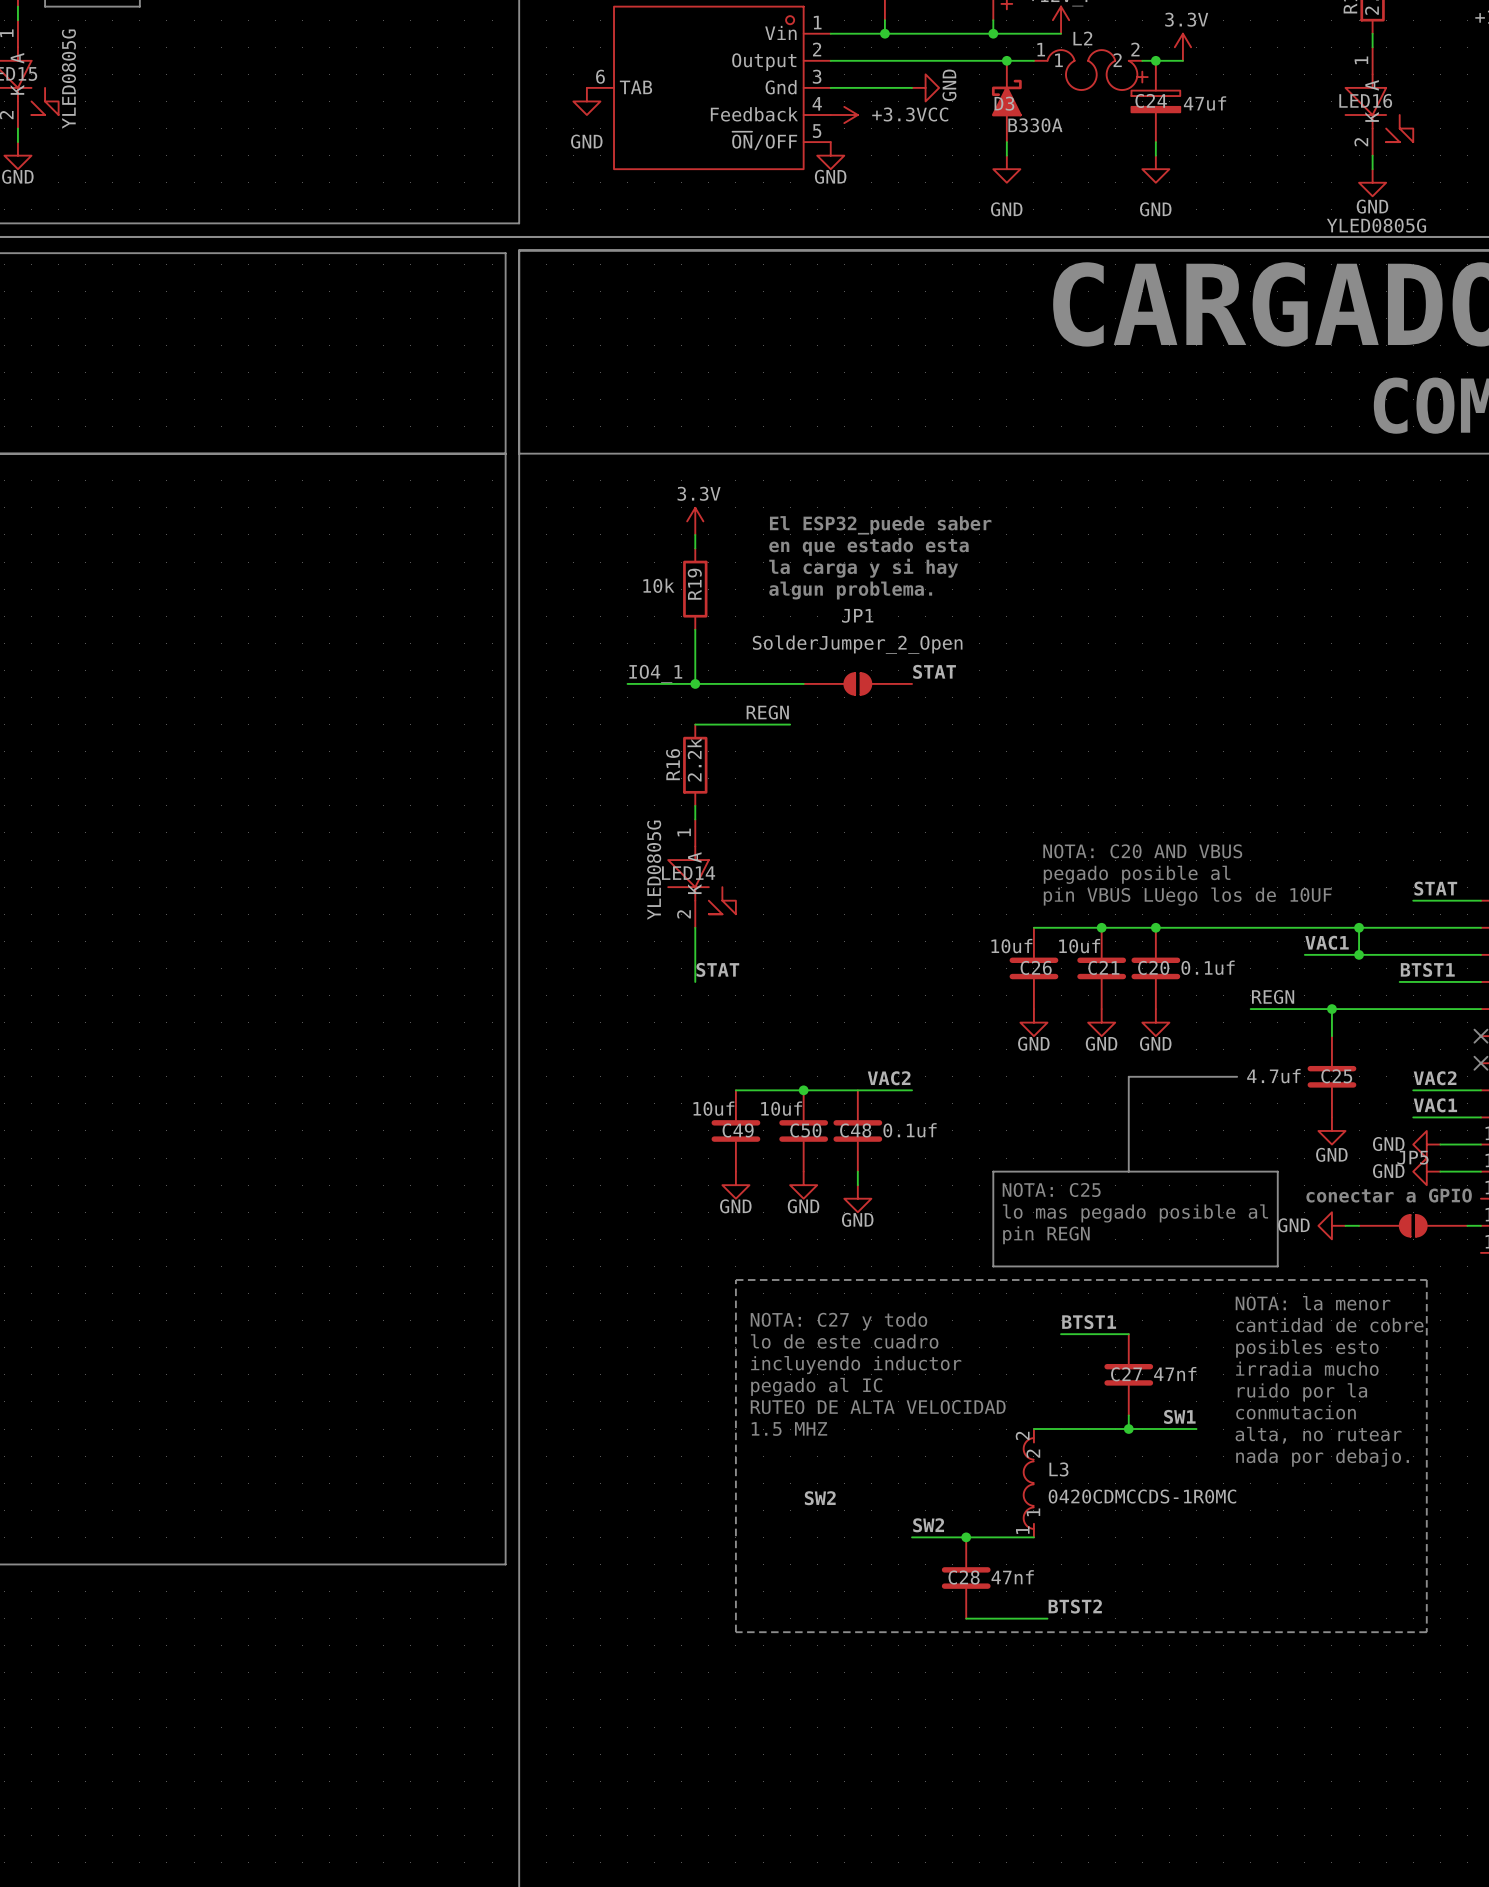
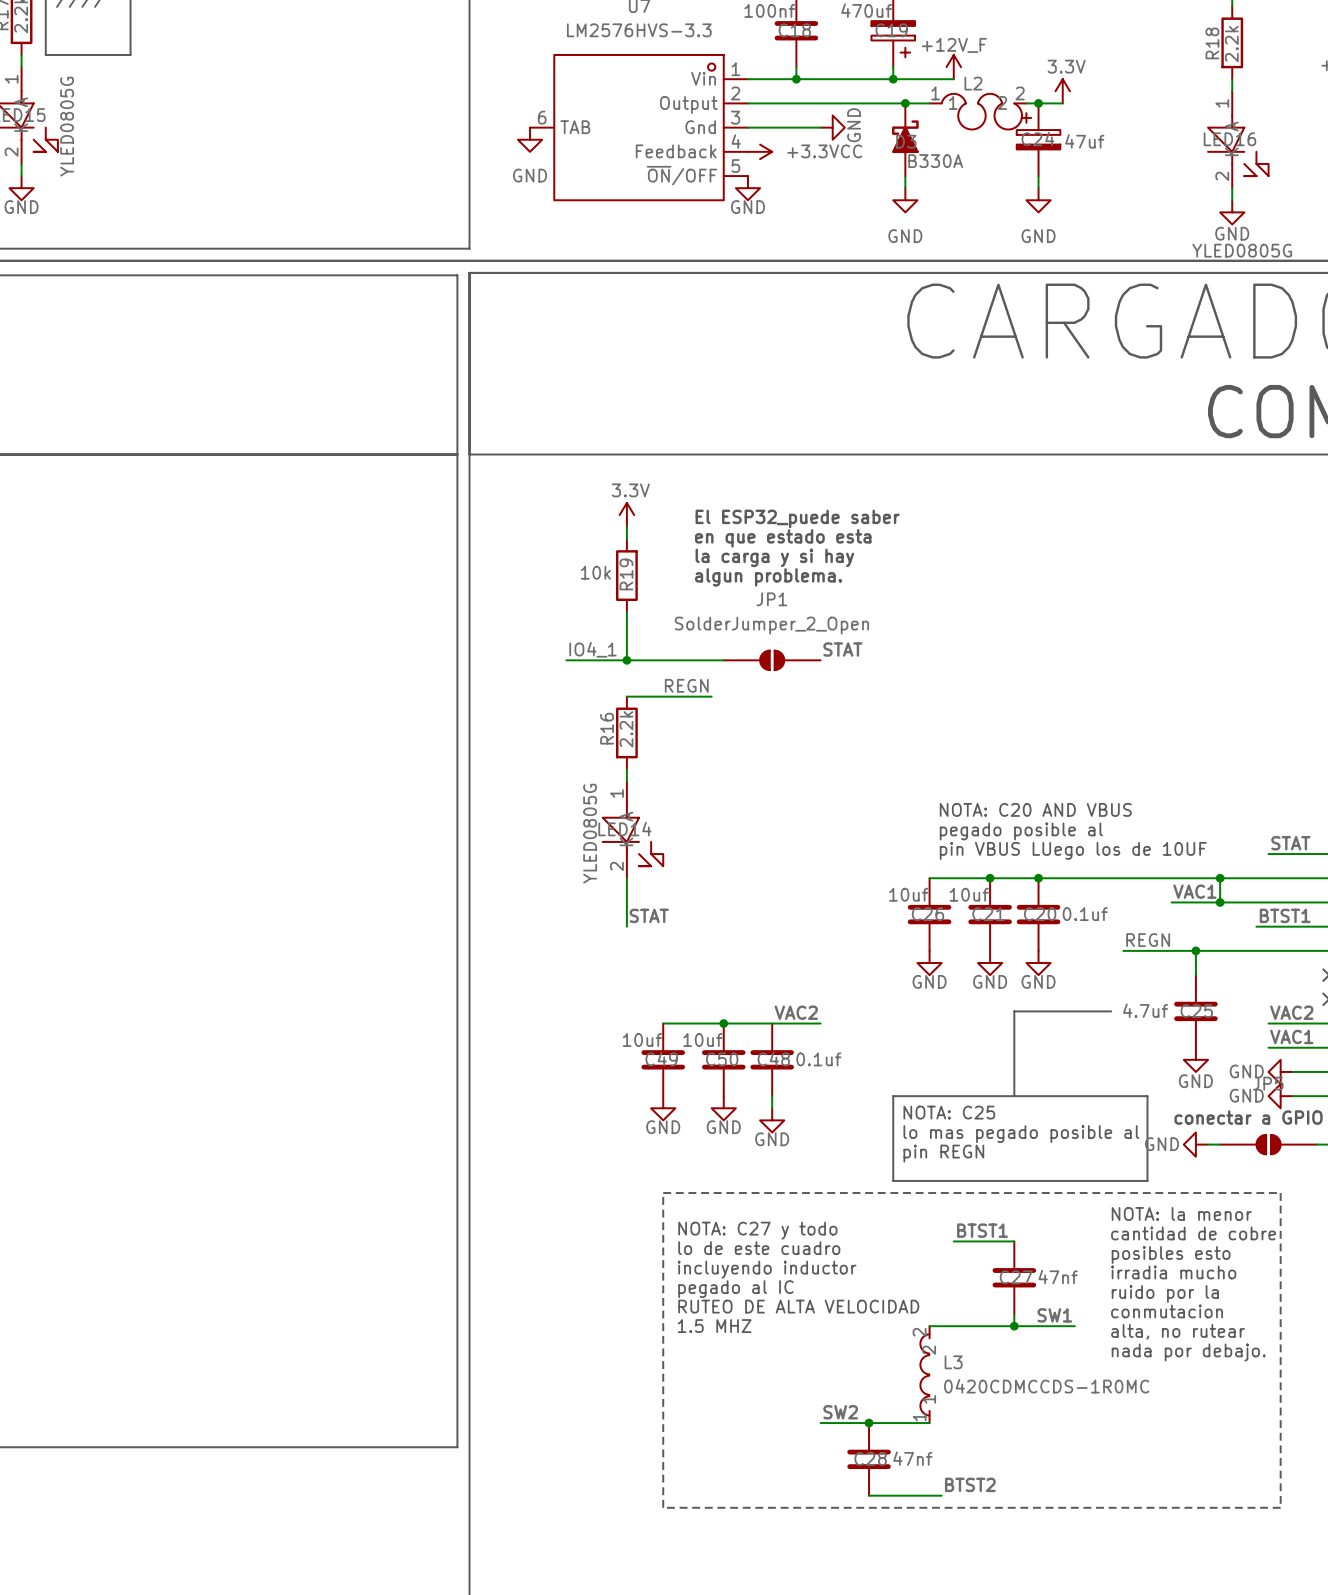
label: SW2 (820, 1498) -> none

